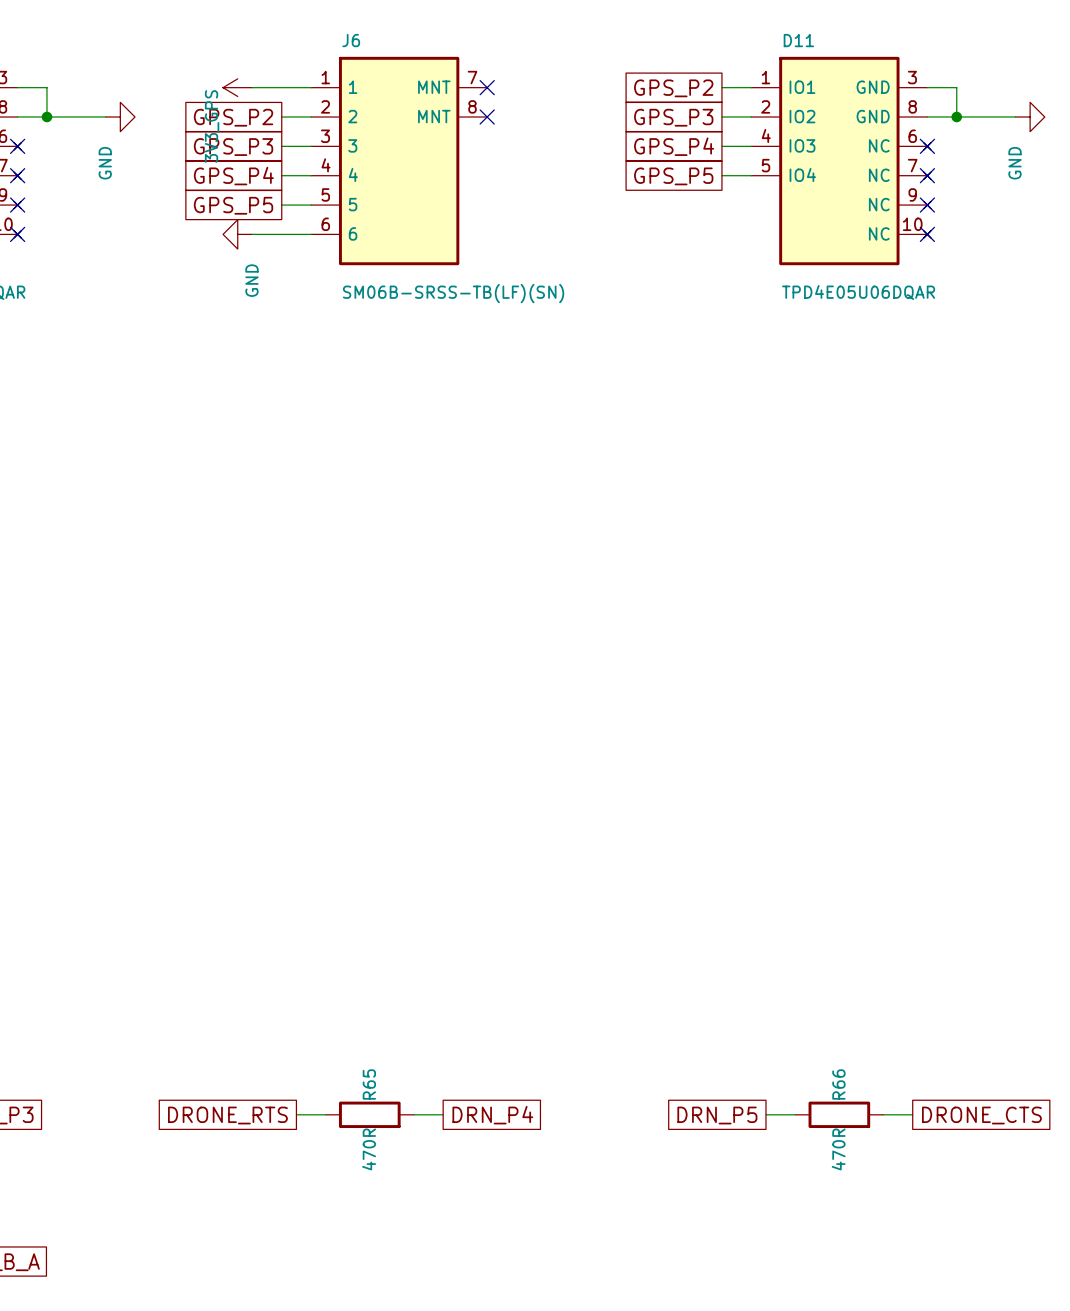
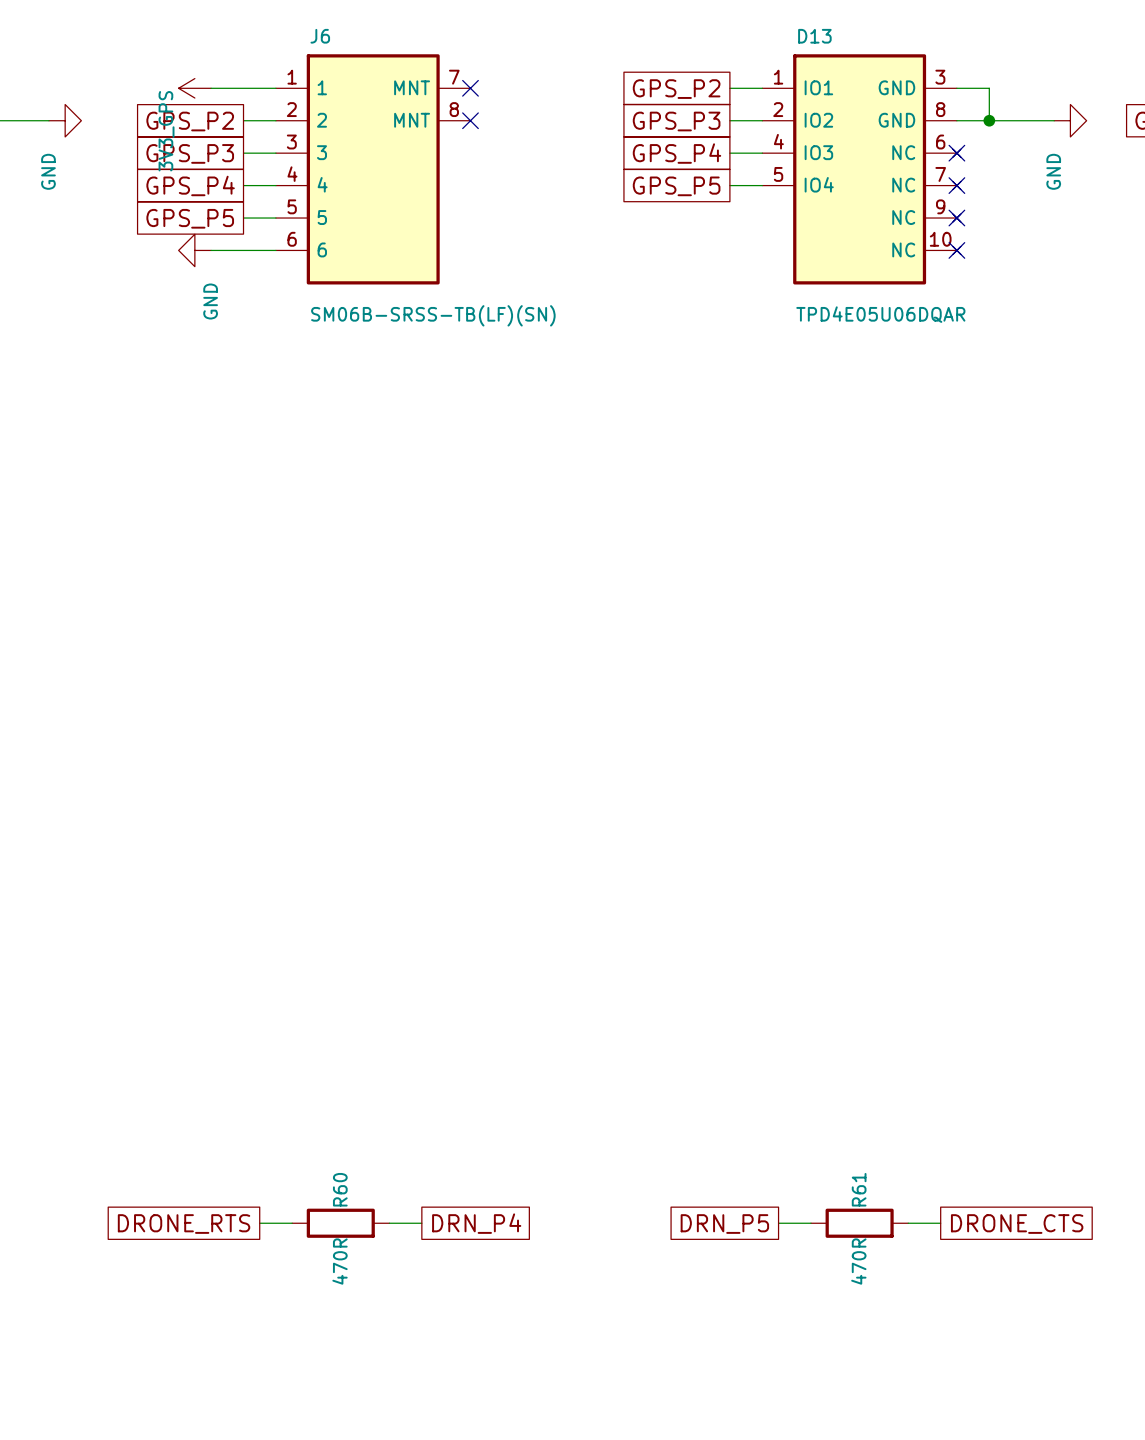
D11 name: D11 (798, 40) -> D13 (814, 36)
R65 name: R65 (369, 1084) -> R60 (340, 1189)
R66 name: R66 (838, 1084) -> R61 (859, 1189)

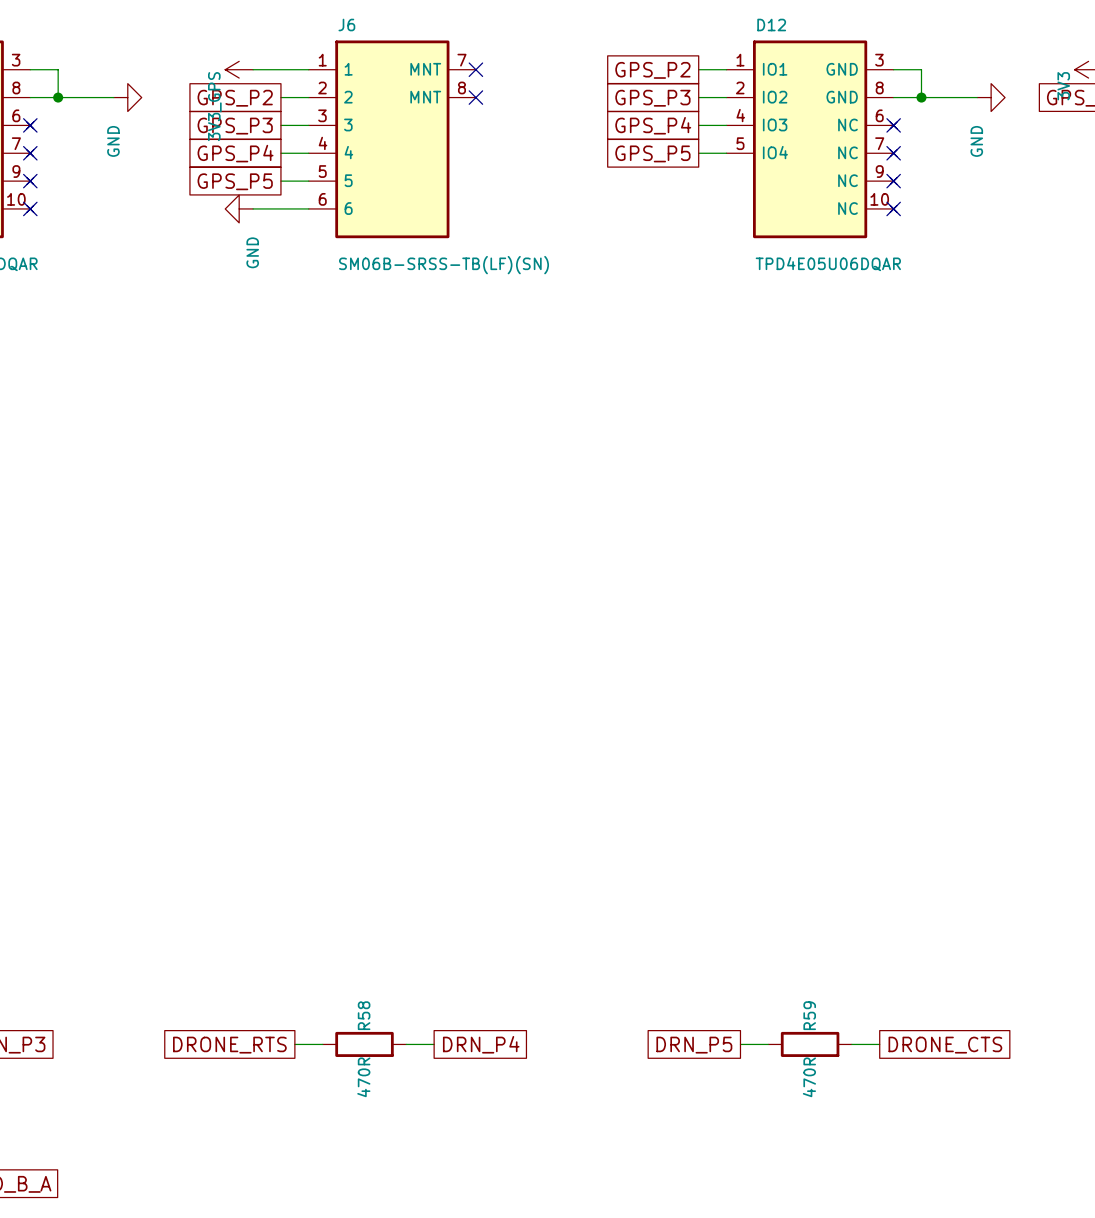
D13 name: D13 (814, 36) -> D12 (771, 25)
R60 name: R60 (340, 1189) -> R58 (364, 1015)
R61 name: R61 (859, 1189) -> R59 (809, 1015)

